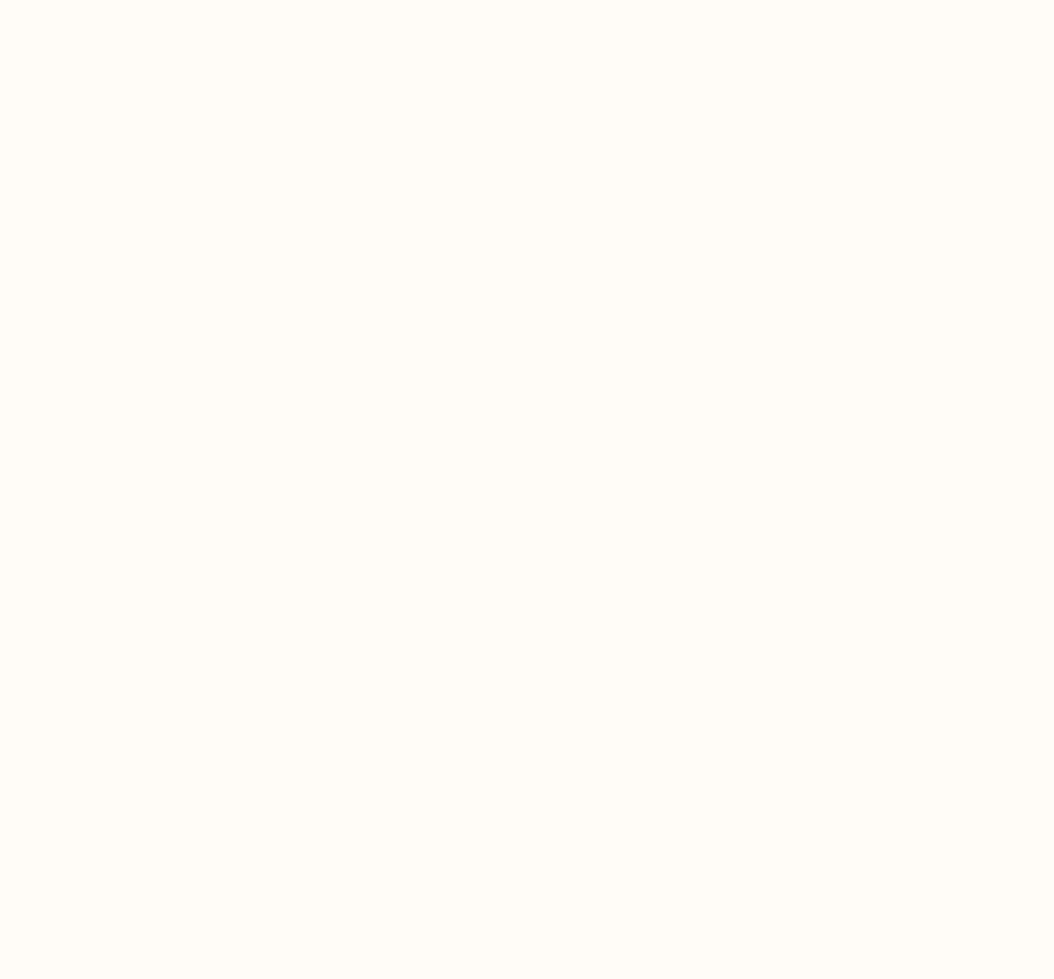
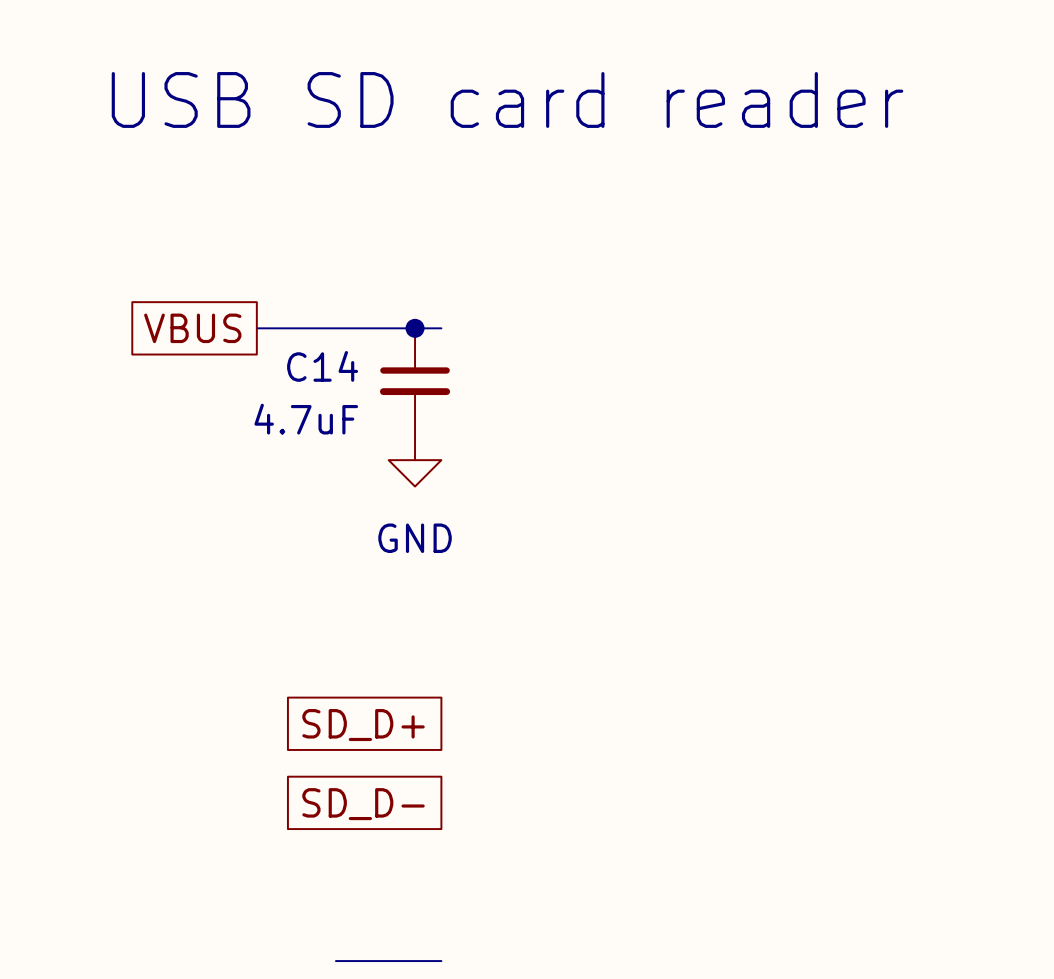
text: none -> USB SD card reader (507, 99)
global label: none -> VBUS (192, 328)
wire: none -> (256, 328) (441, 328)
junction: none -> (415, 328)
C14: none -> 4.7uF (415, 381)
power symbol: none -> GND (415, 460)
global label: none -> SD_D+ (363, 725)
global label: none -> SD_D- (363, 804)
wire: none -> (335, 961) (441, 961)

